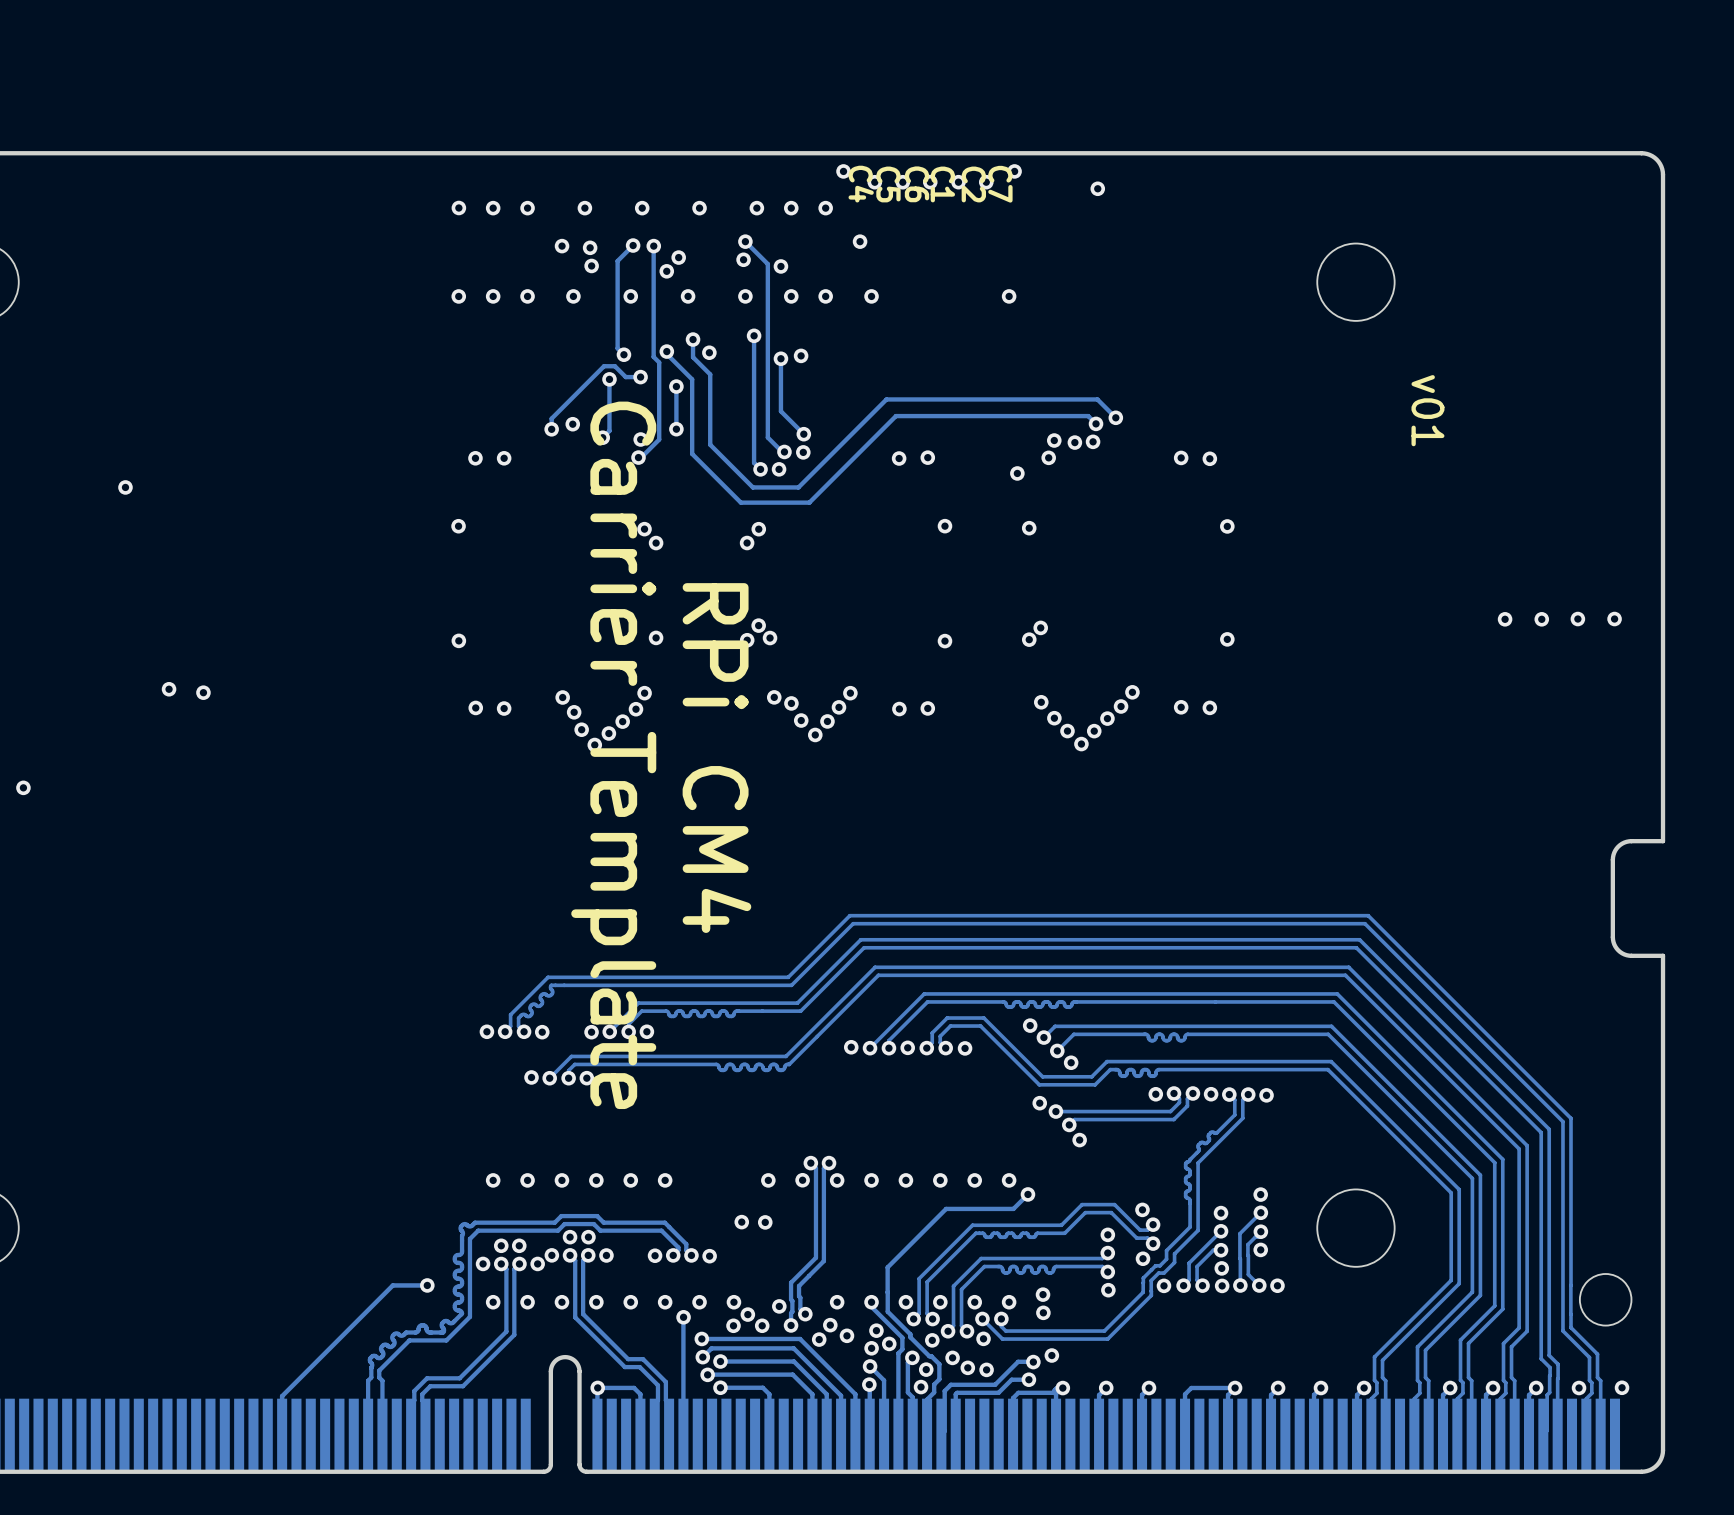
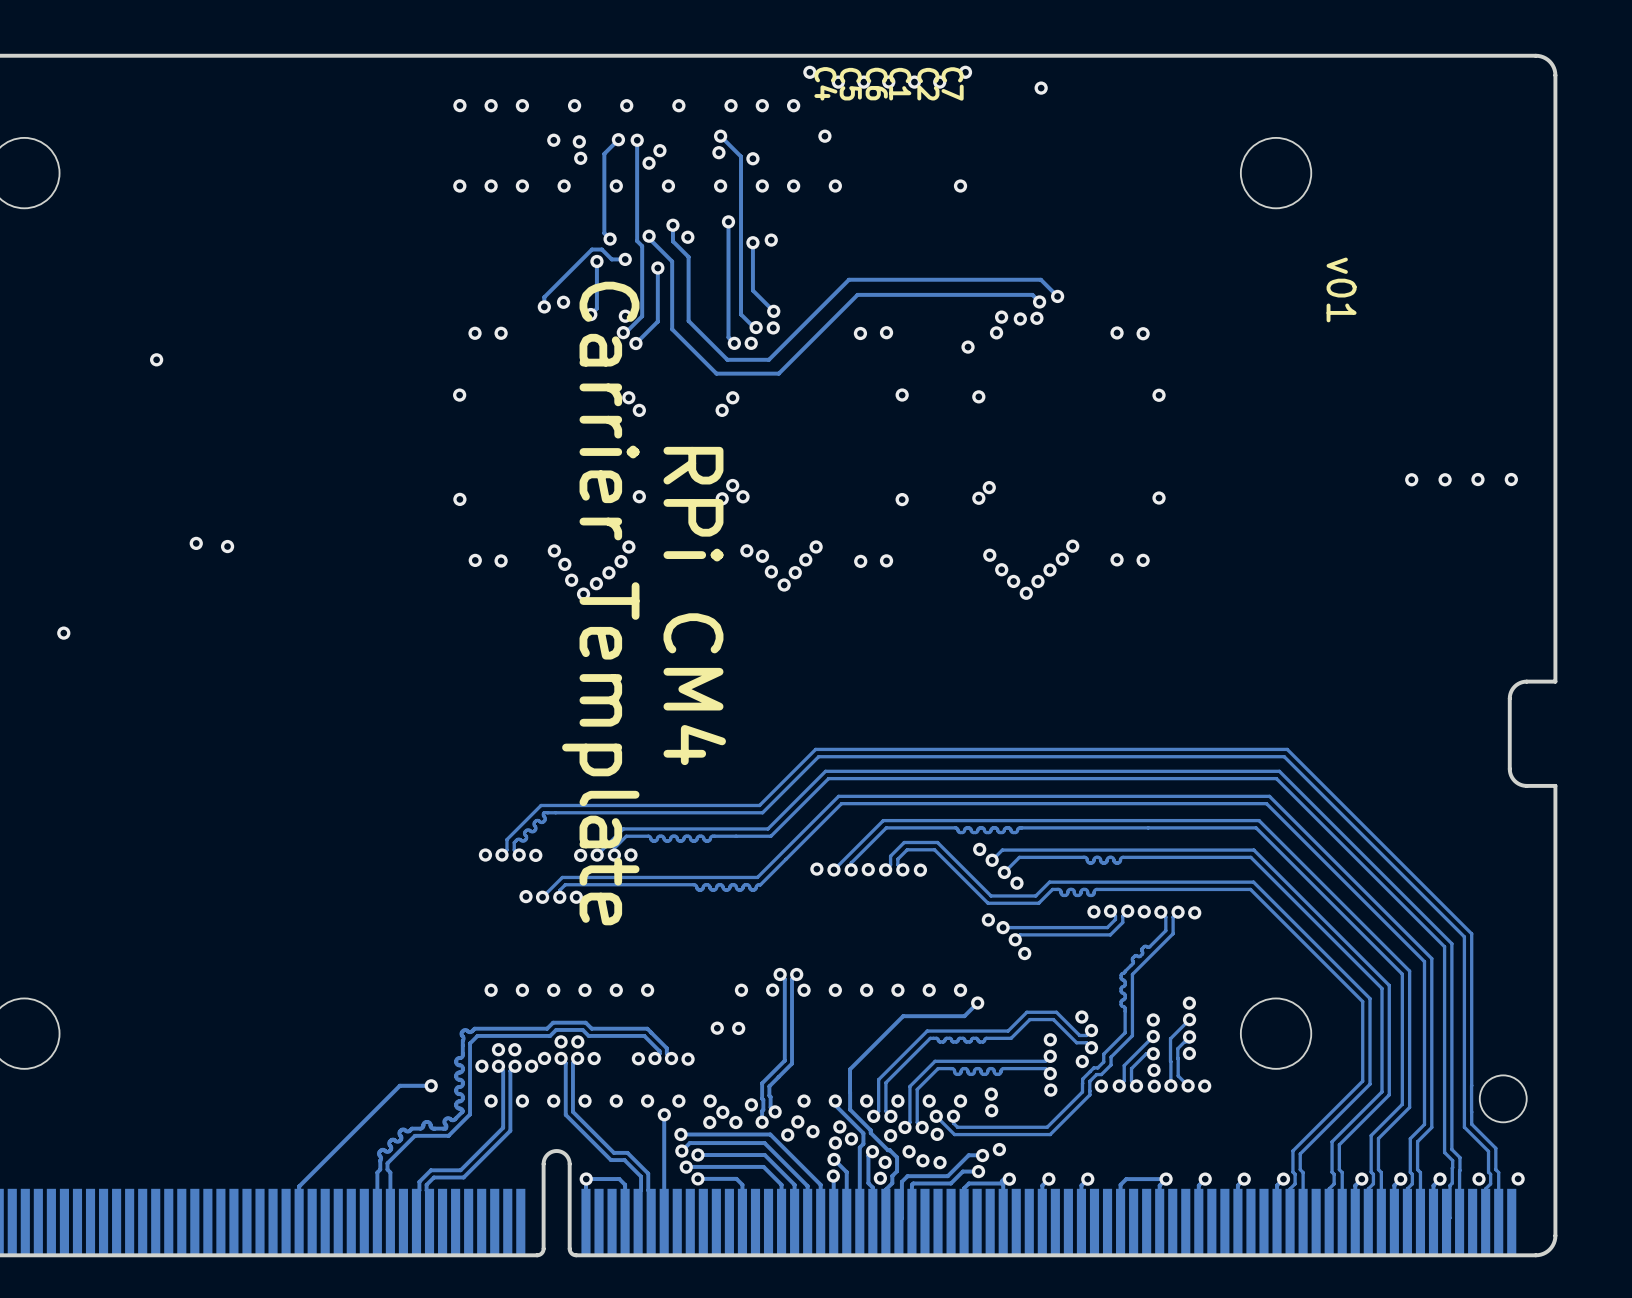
track: none -> (657, 306) (657, 321) (635, 343)
via position: (676, 429) -> (635, 343)

